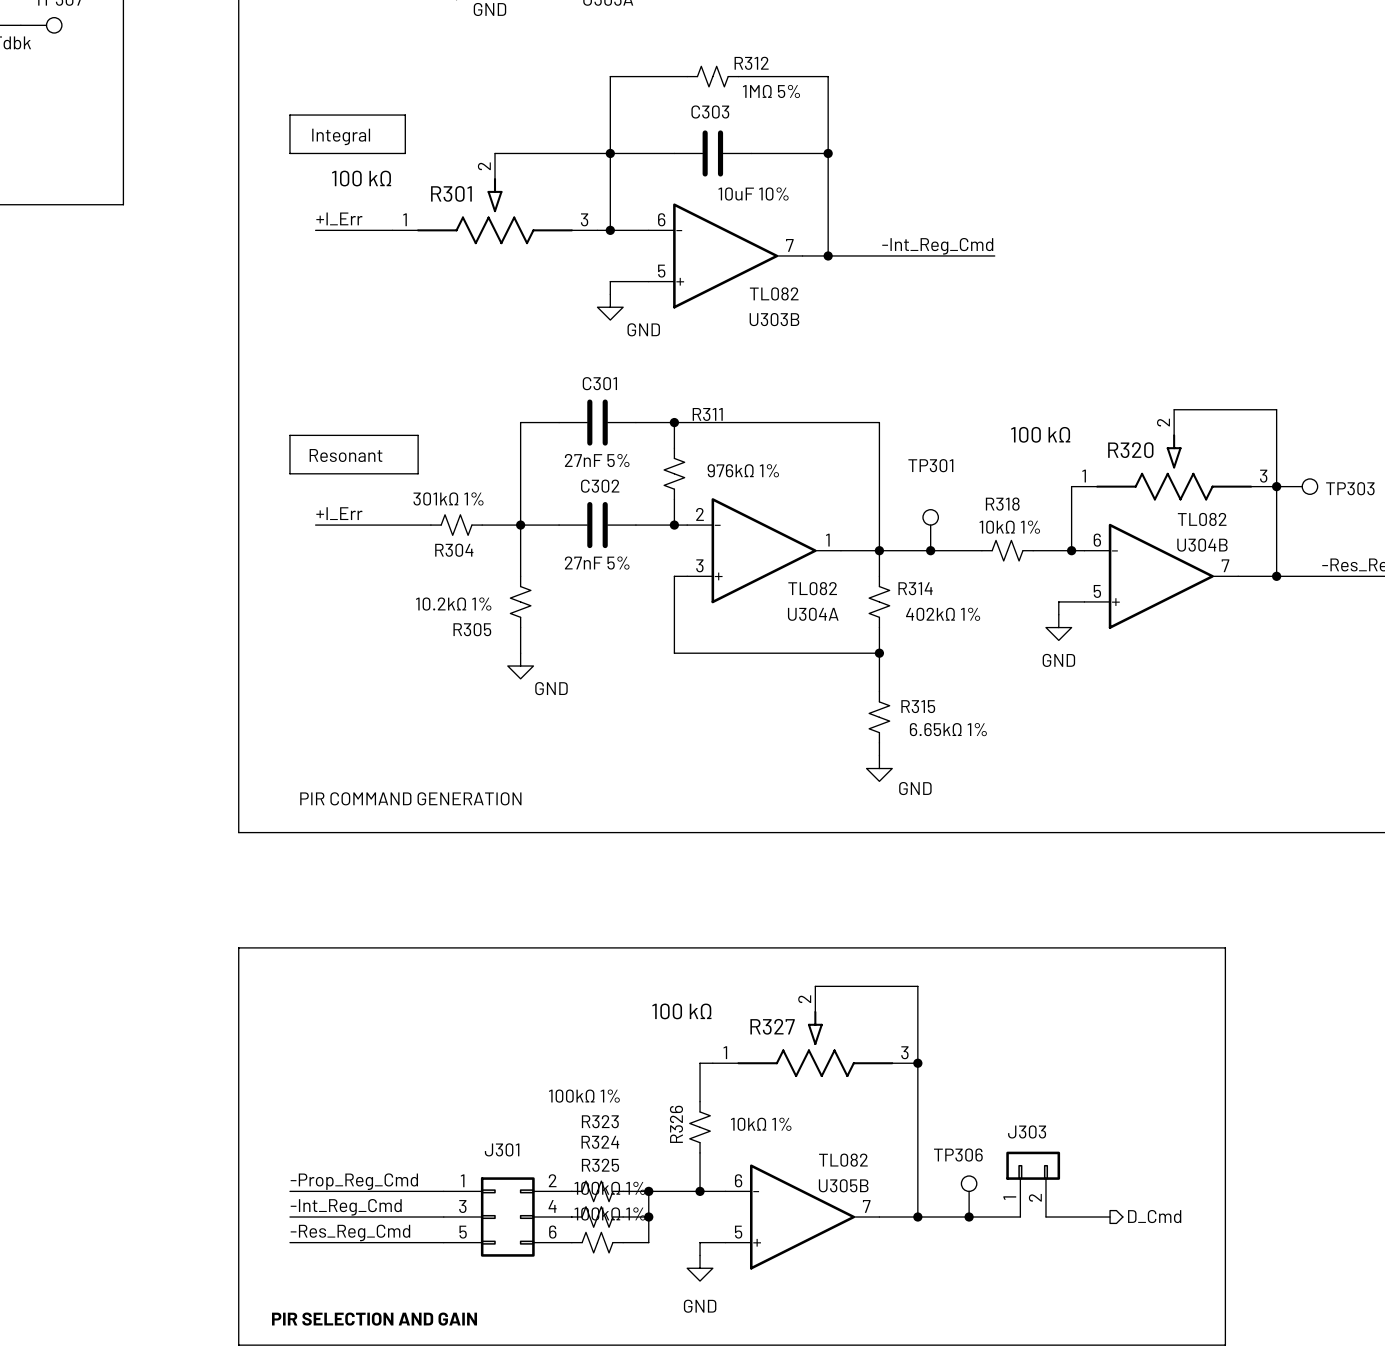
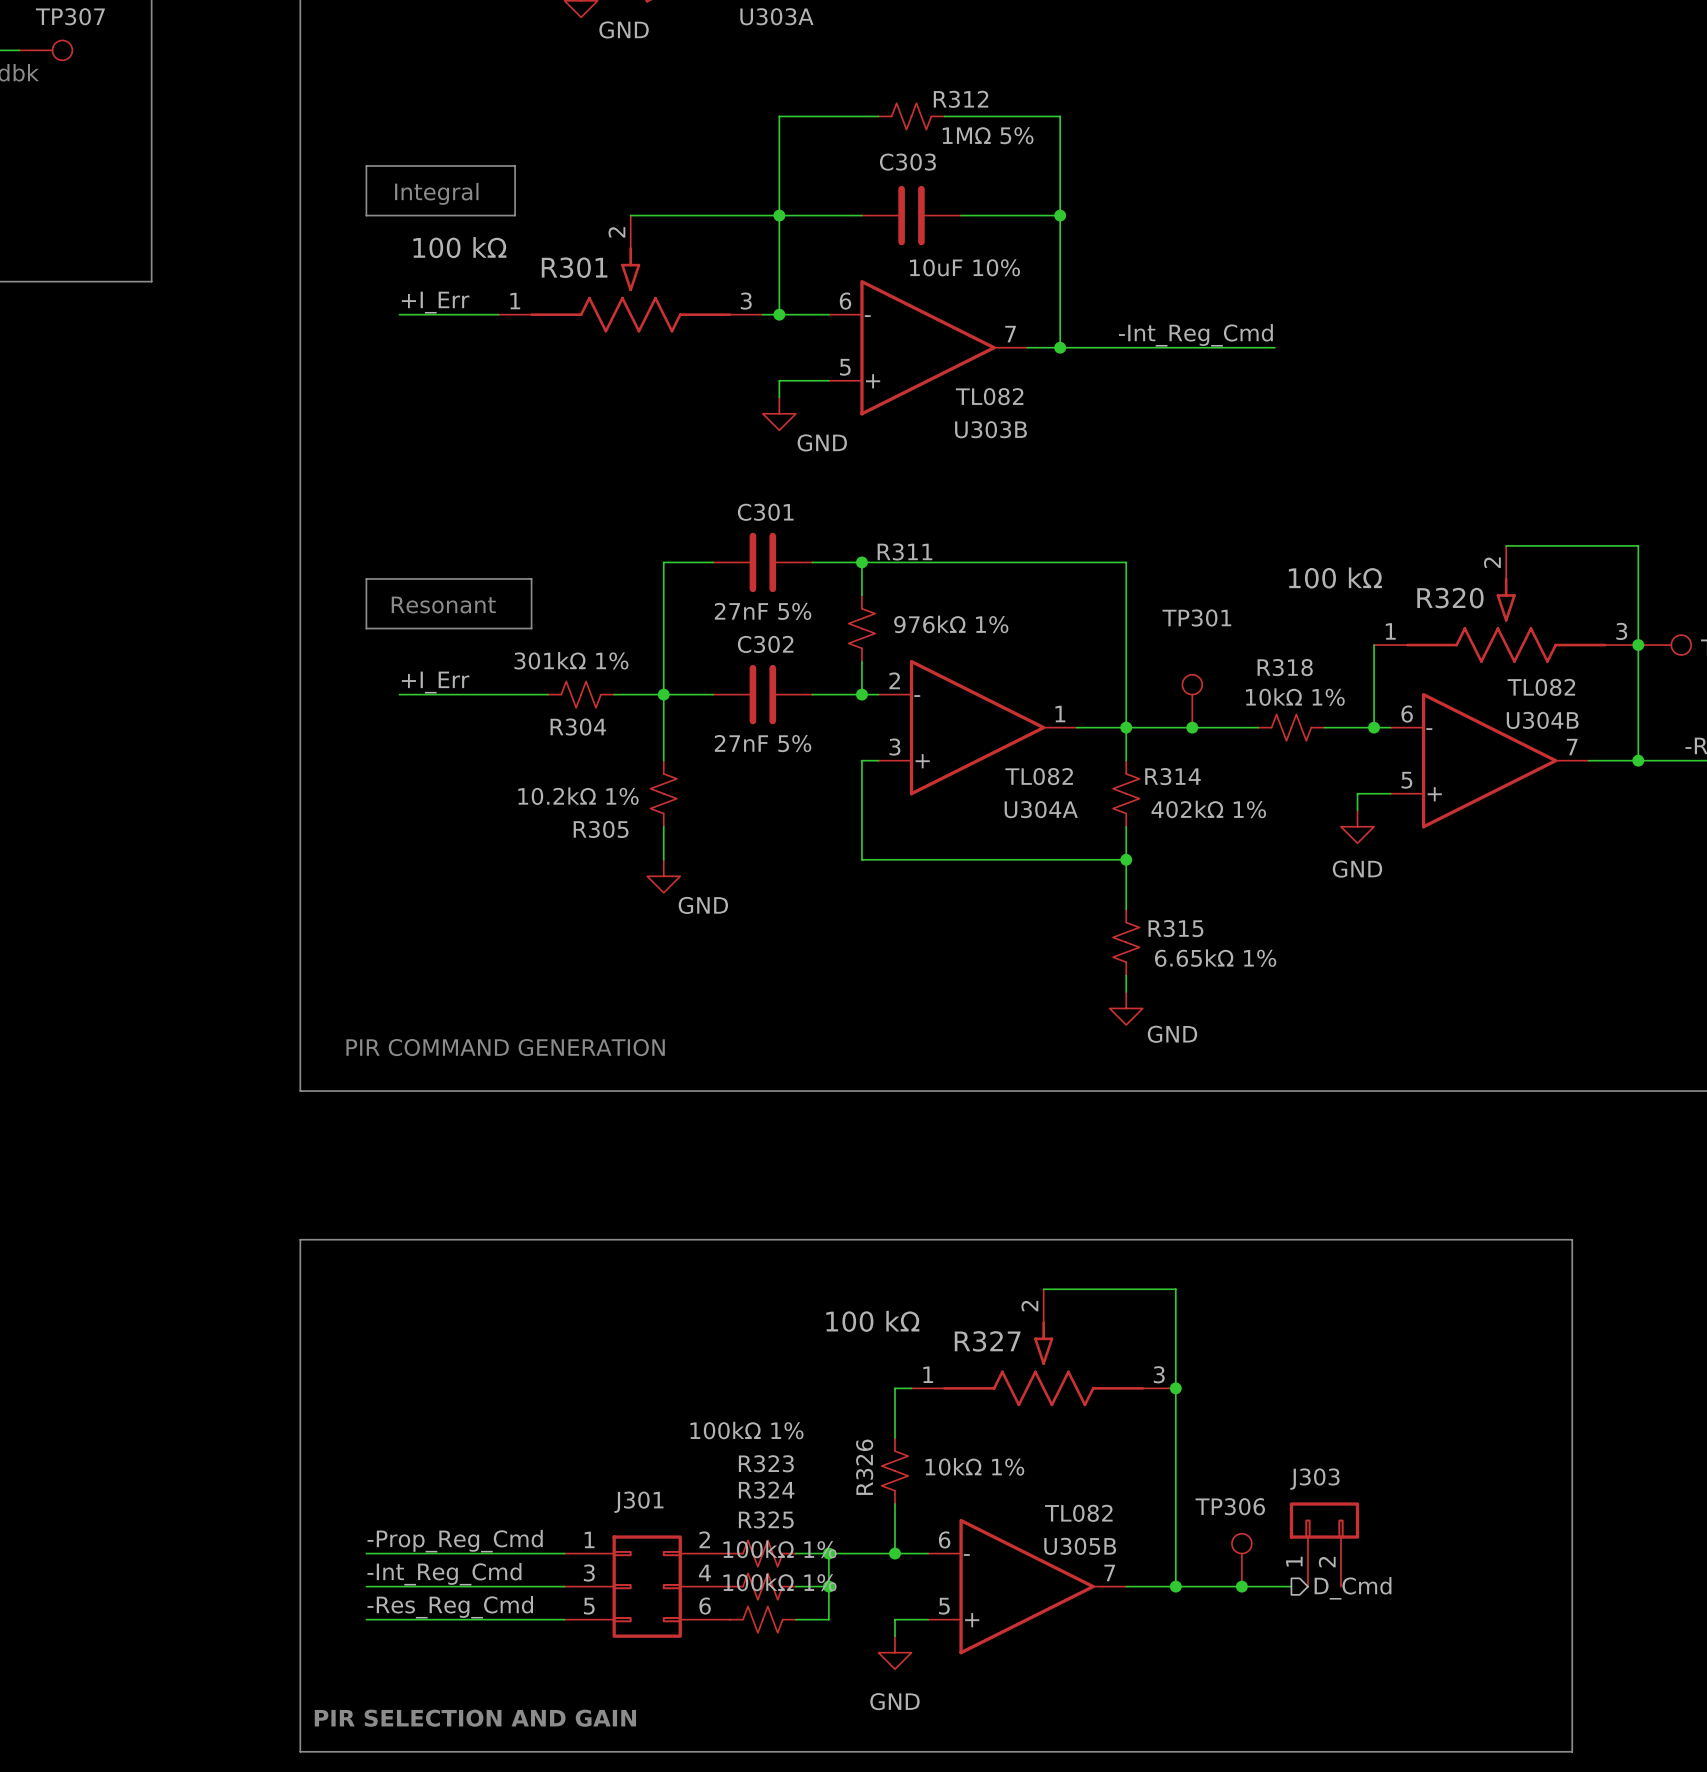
hierarchical label position: D_Cmd (1154, 1216) -> D_Cmd (1353, 1588)
wire: (1007, 1217) (1020, 1217) -> none
wire: (1045, 1217) (1110, 1217) -> none

